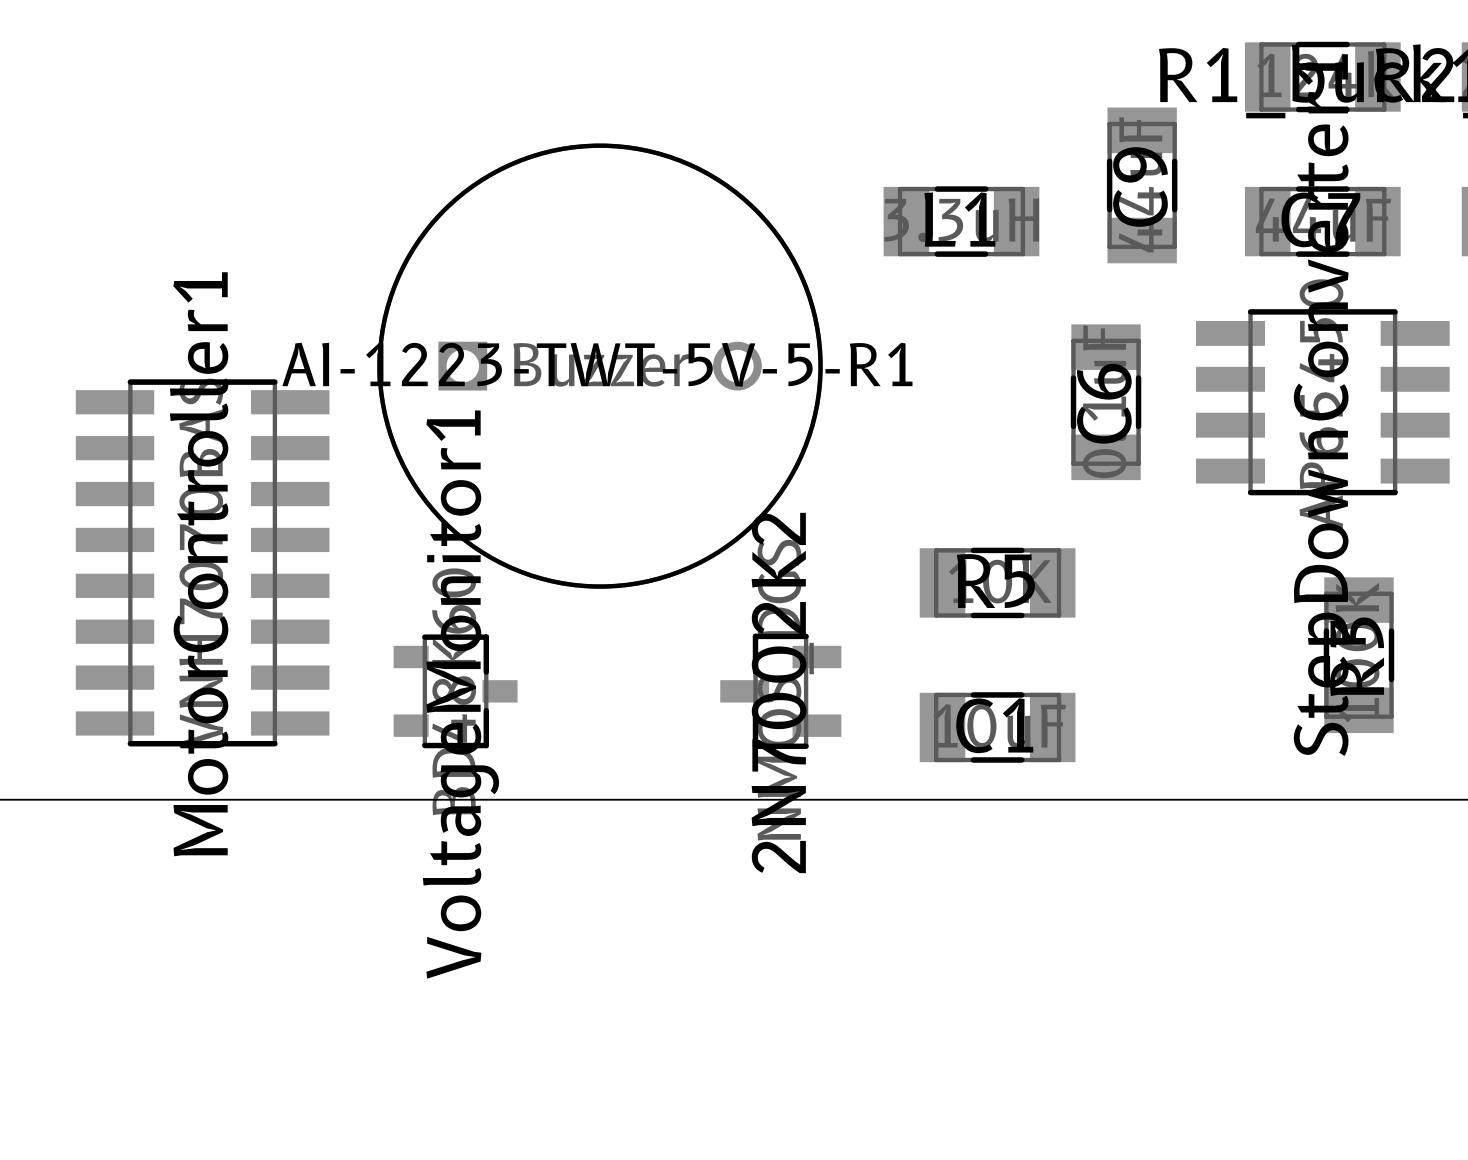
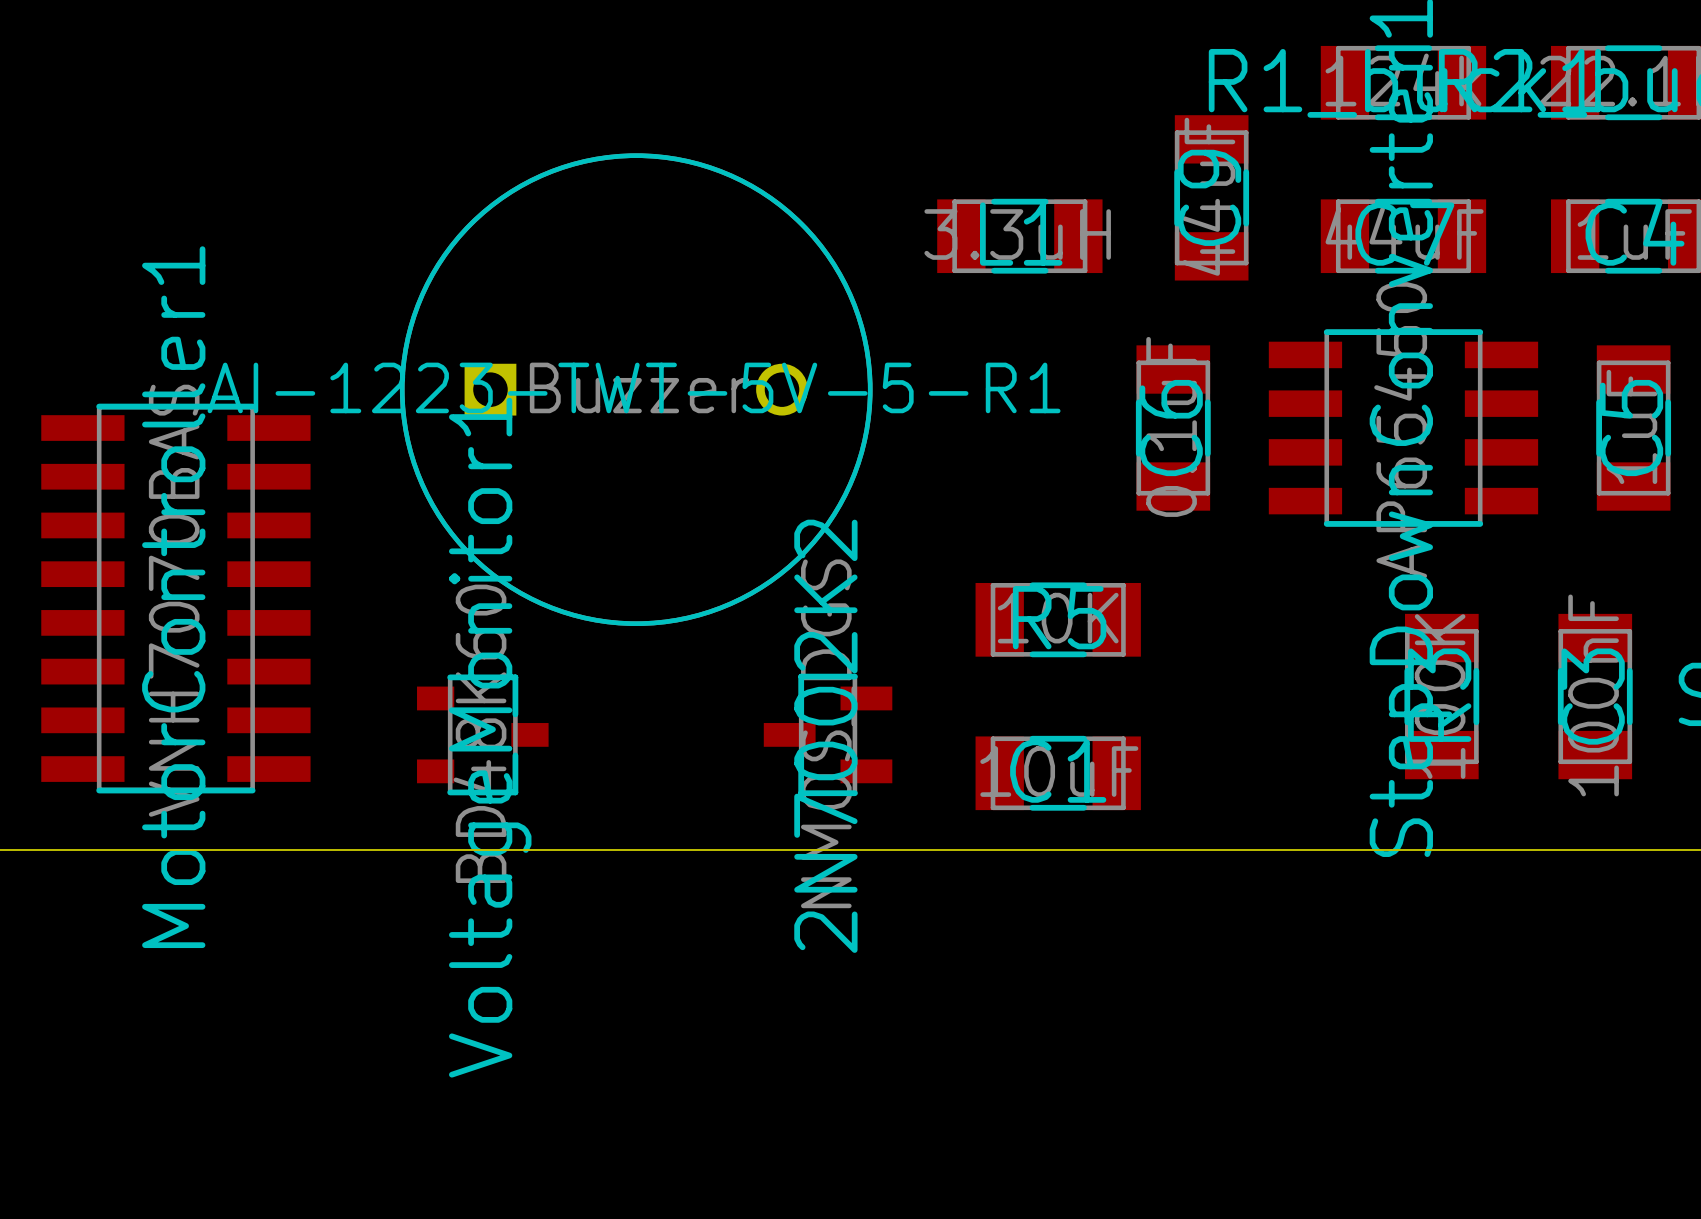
MotorController1 position: (202, 562) -> (175, 598)

